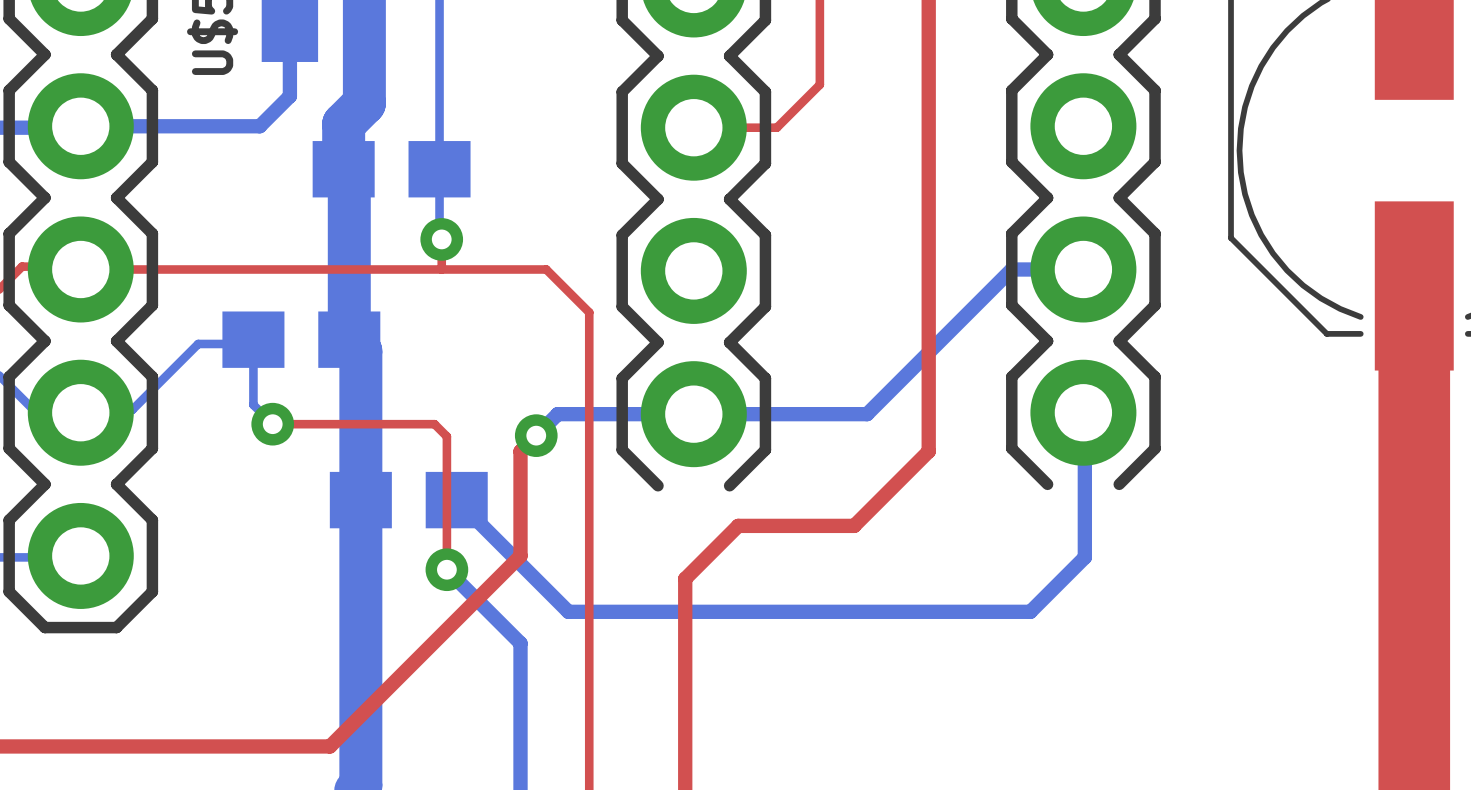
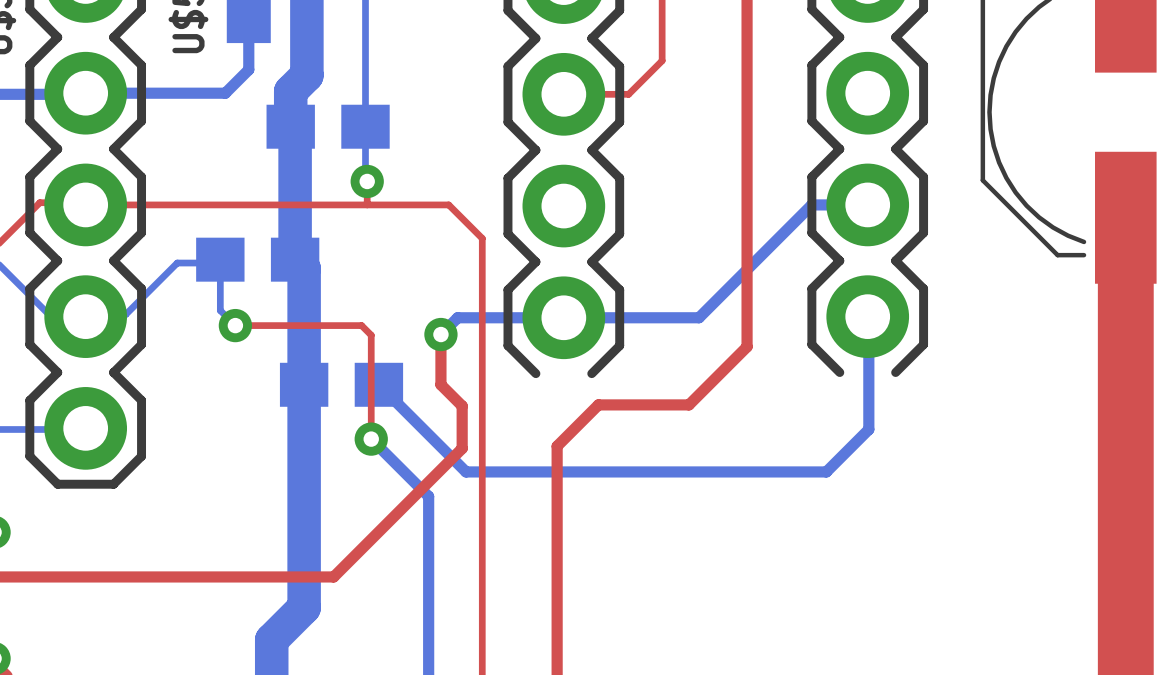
top track: (536, 435) (520, 451) (520, 555) (330, 746) -> (440, 334) (440, 384) (462, 406) (462, 448) (333, 576) (280, 576)

